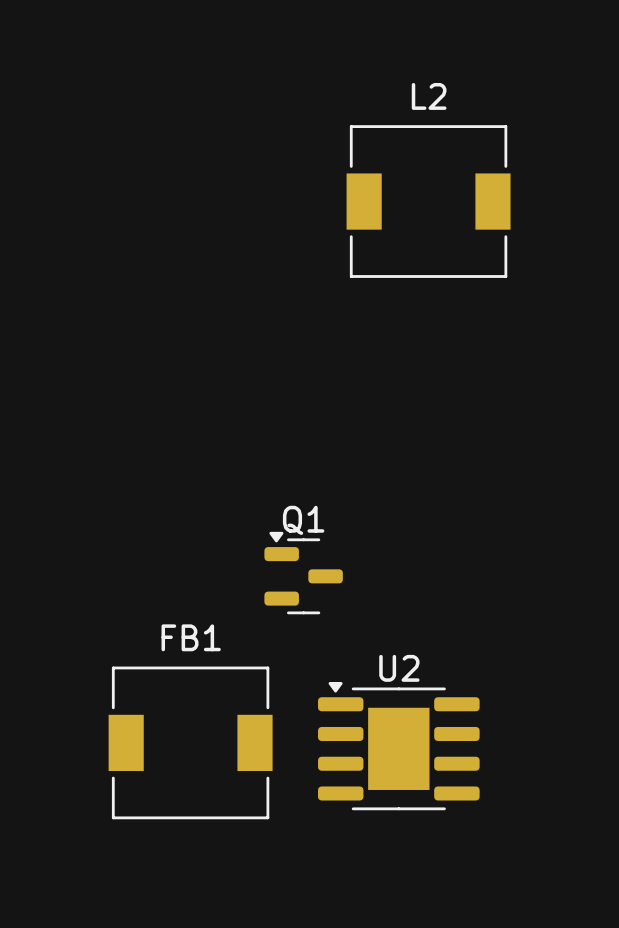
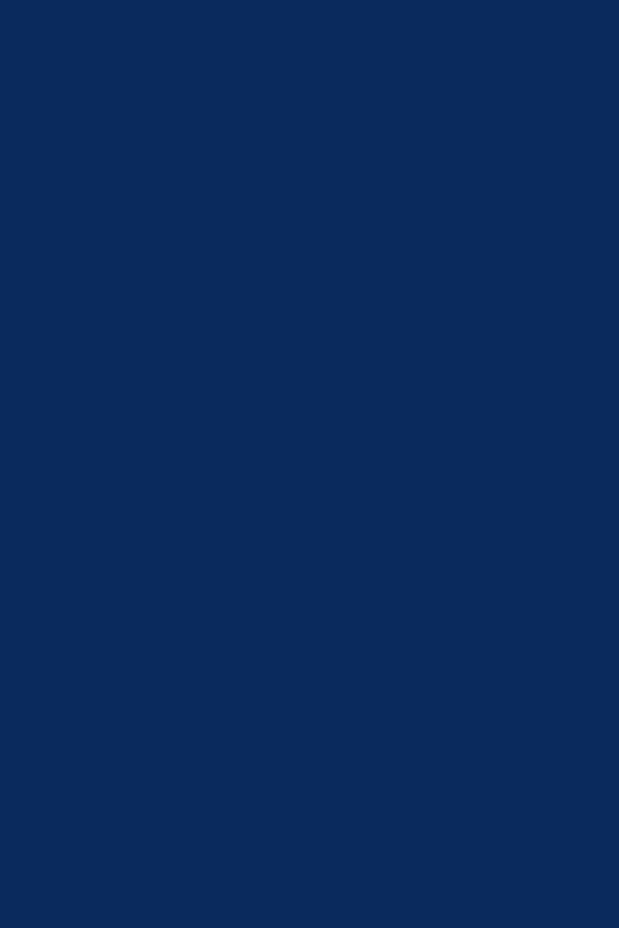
L2: (428, 201) -> none
Q1: (303, 573) -> none
FB1: (190, 742) -> none
U2: (398, 746) -> none

